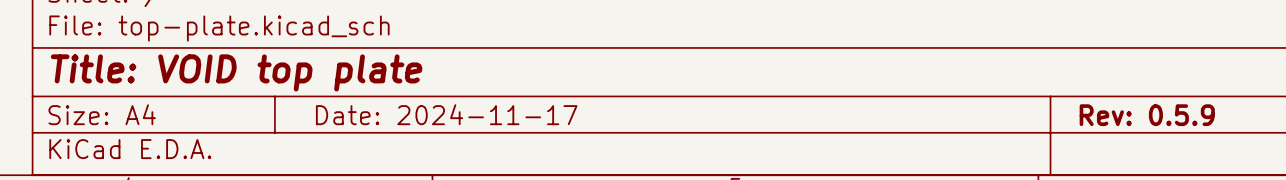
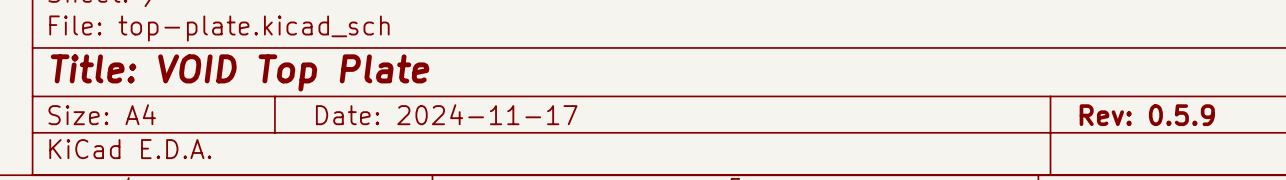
title block: Title: VOID top plate (236, 72) -> Title: VOID Top Plate (240, 72)

